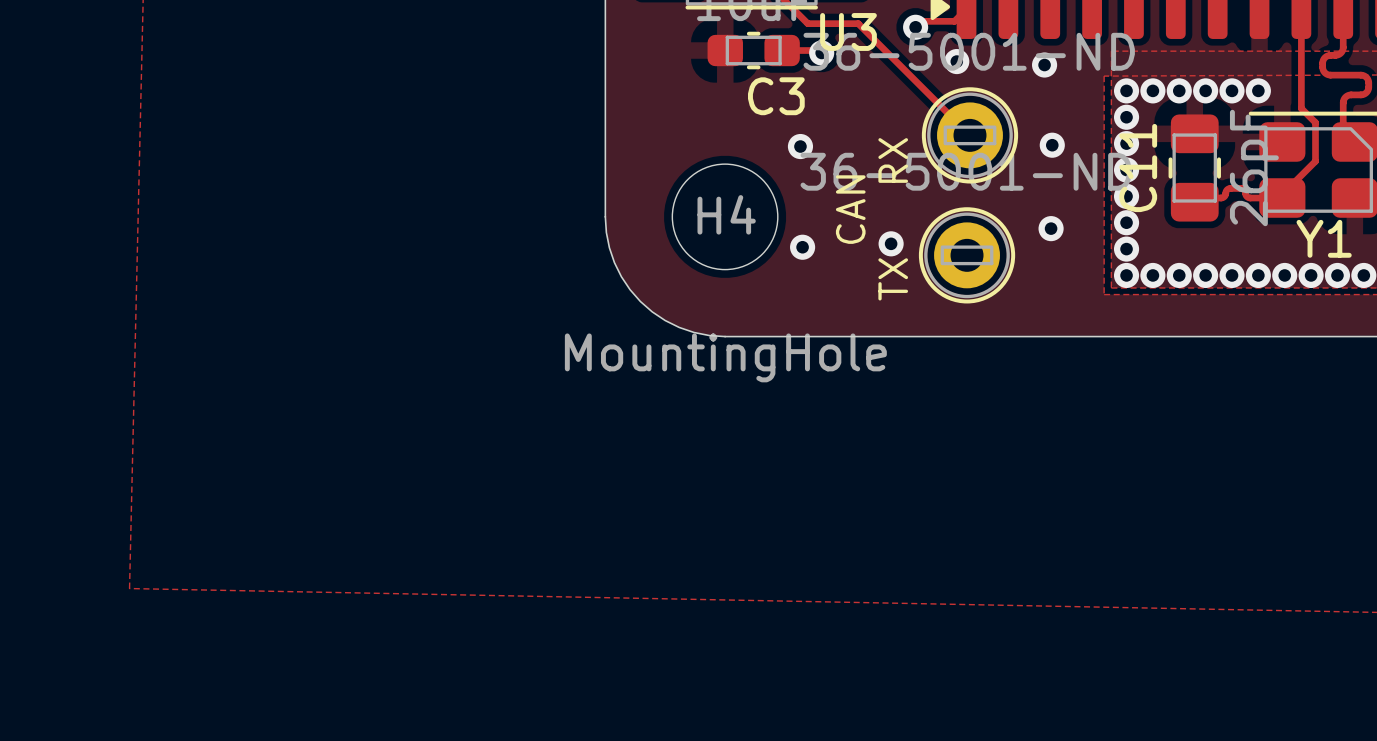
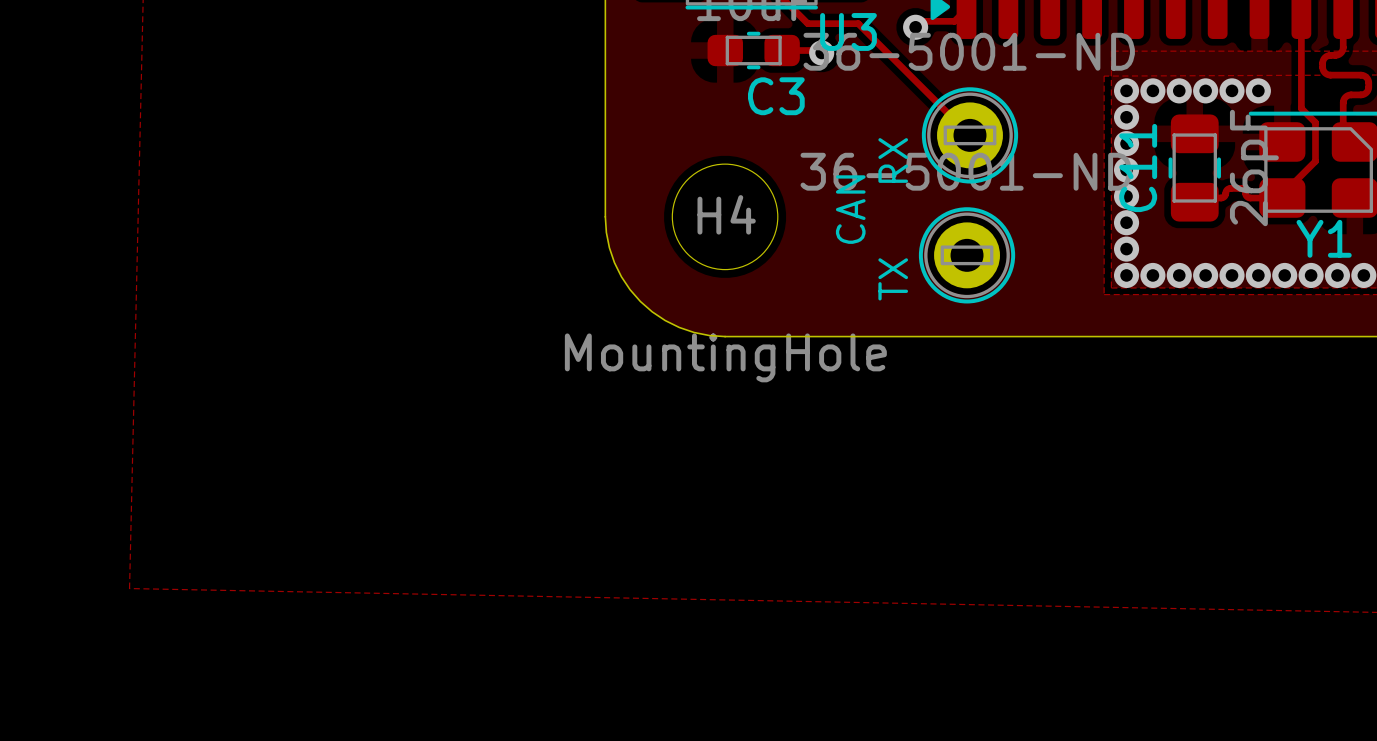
via: (956, 61) -> none
via: (1044, 65) -> none
via: (1052, 145) -> none
via: (800, 146) -> none
via: (1051, 228) -> none
via: (891, 243) -> none
via: (802, 247) -> none

